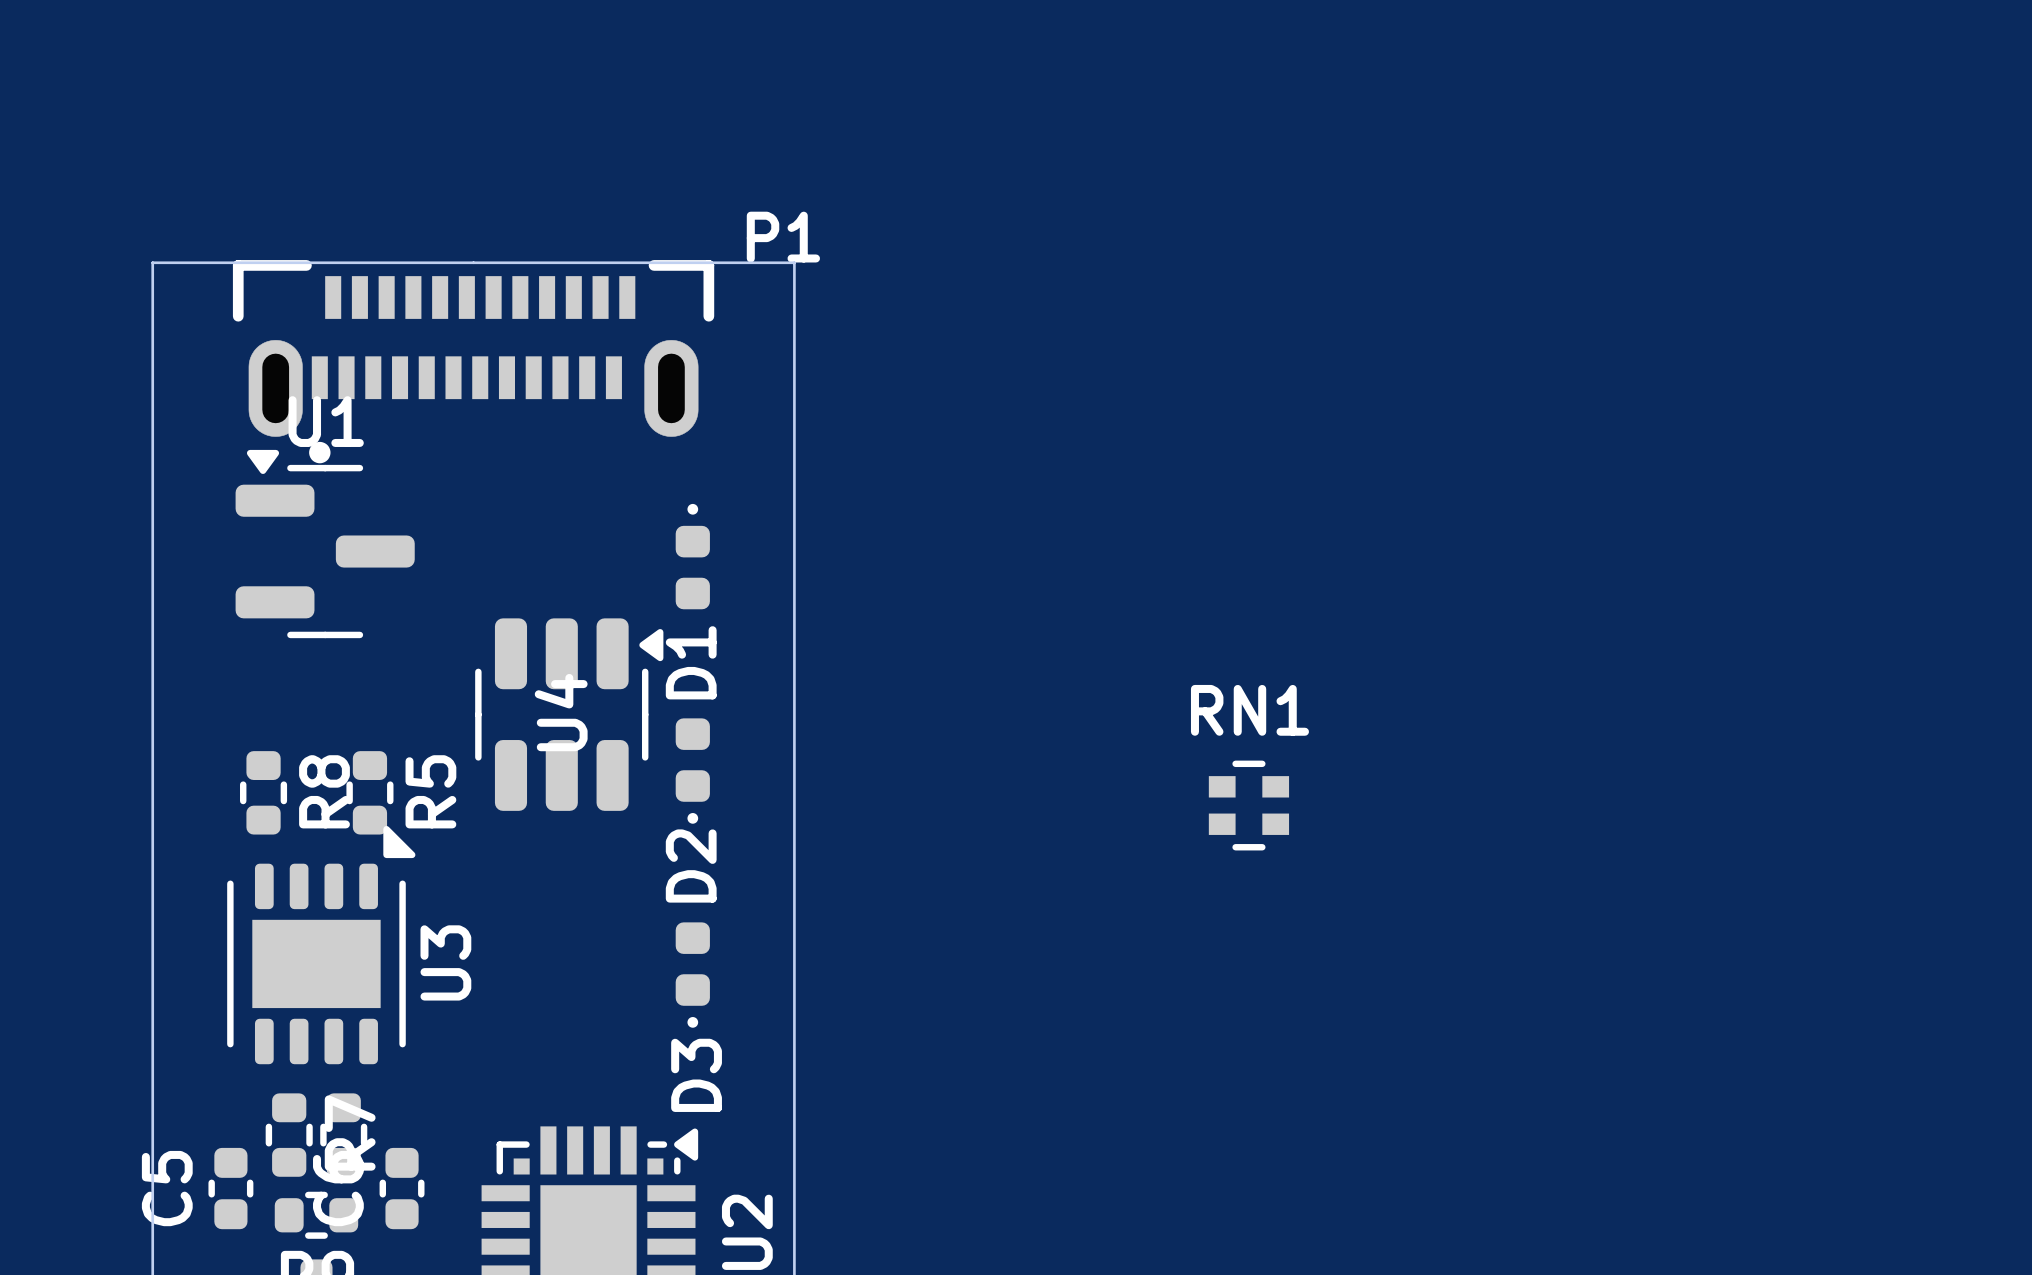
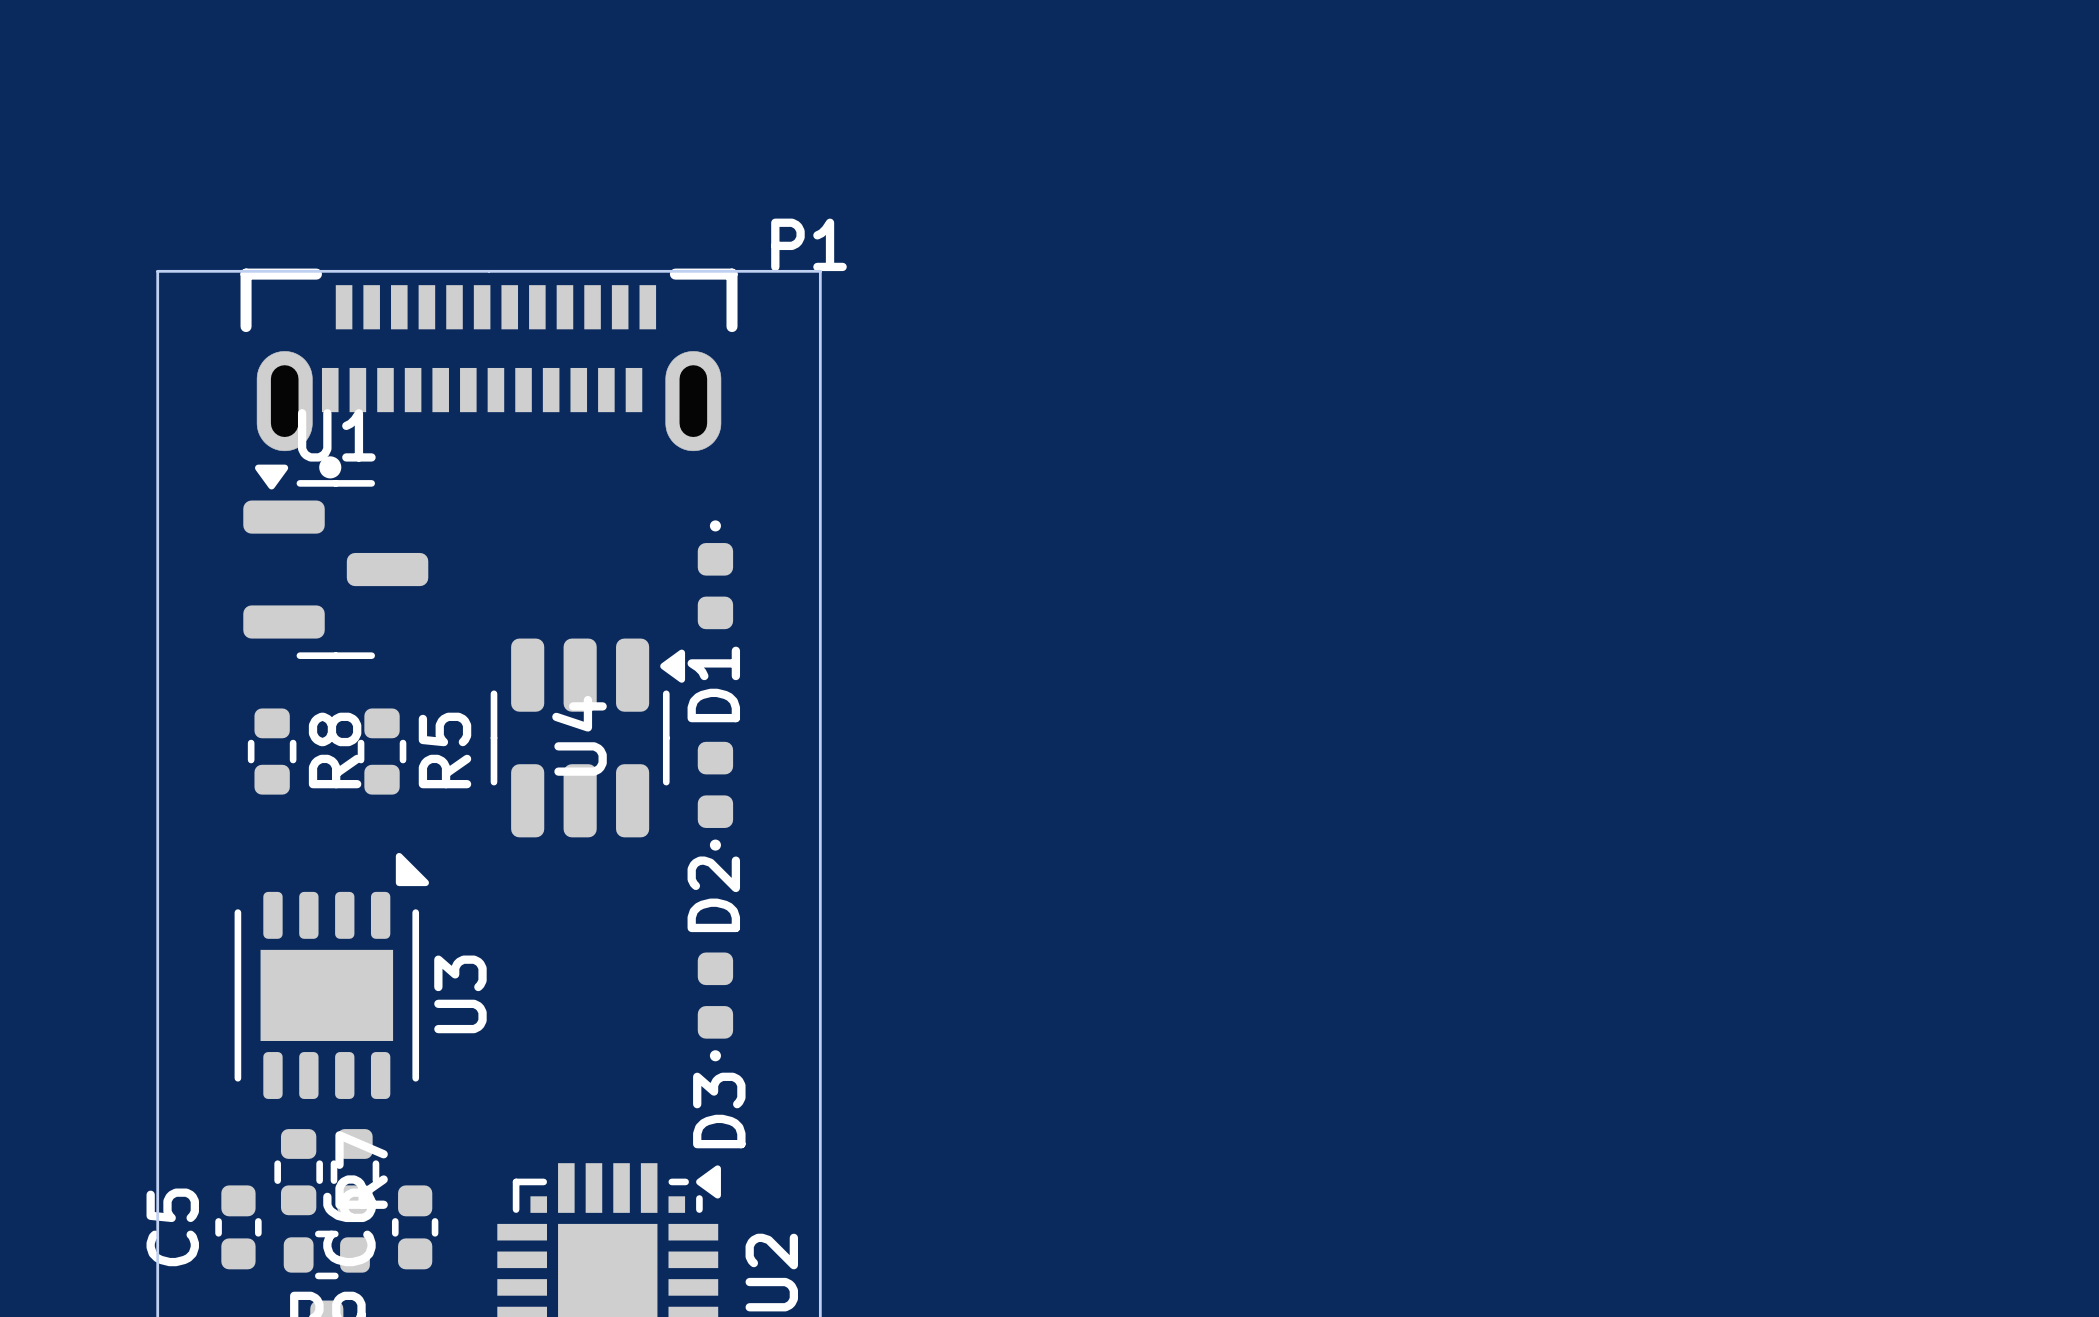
R8 position: (263, 792) -> (272, 751)
R5 position: (369, 792) -> (382, 751)
RN1: (1248, 805) -> none

